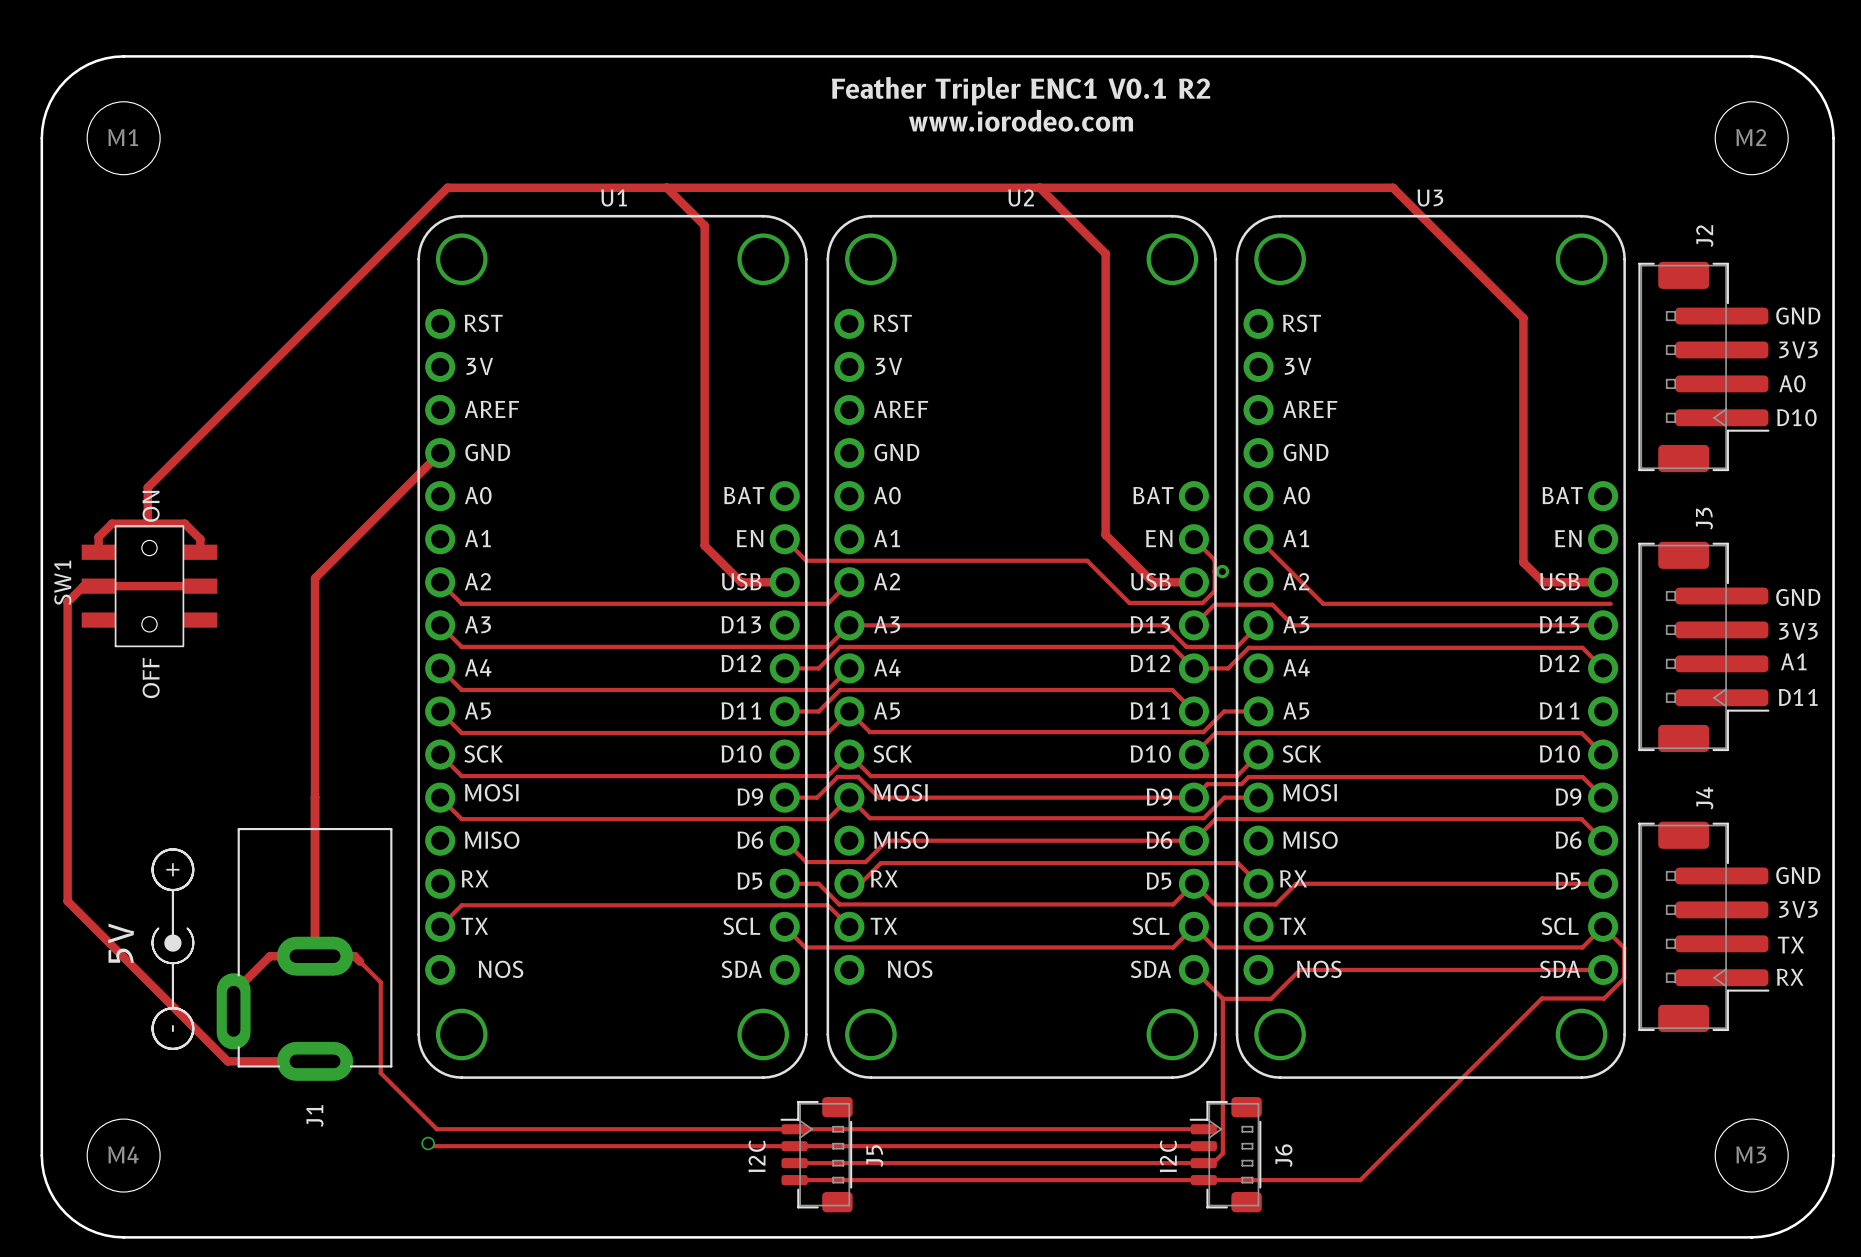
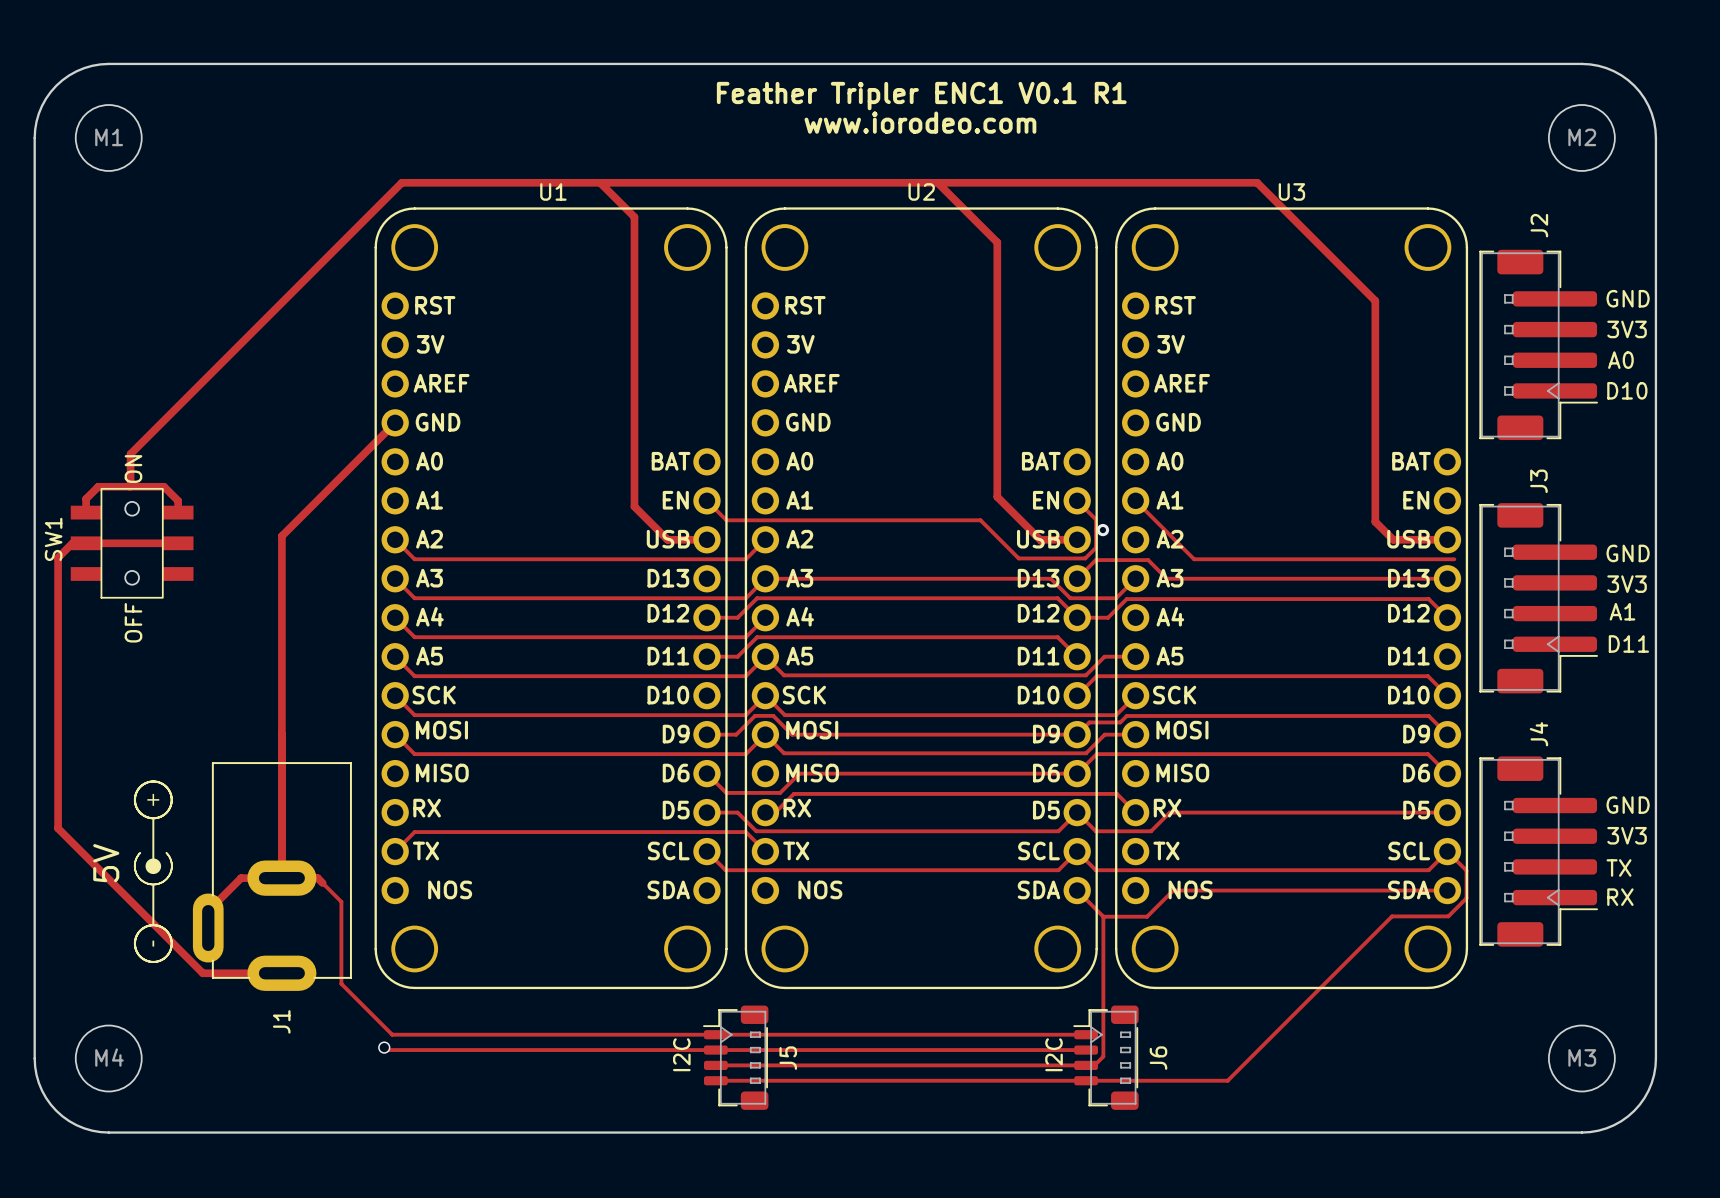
text: Feather Tripler ENC1 V0.1 R2 (1021, 91) -> Feather Tripler ENC1 V0.1 R1 (921, 96)

